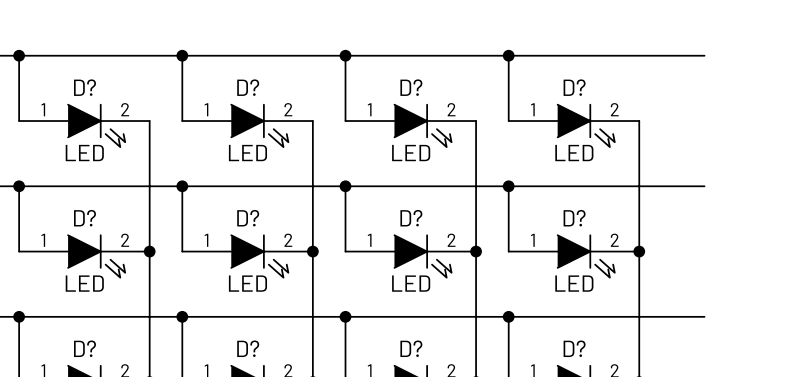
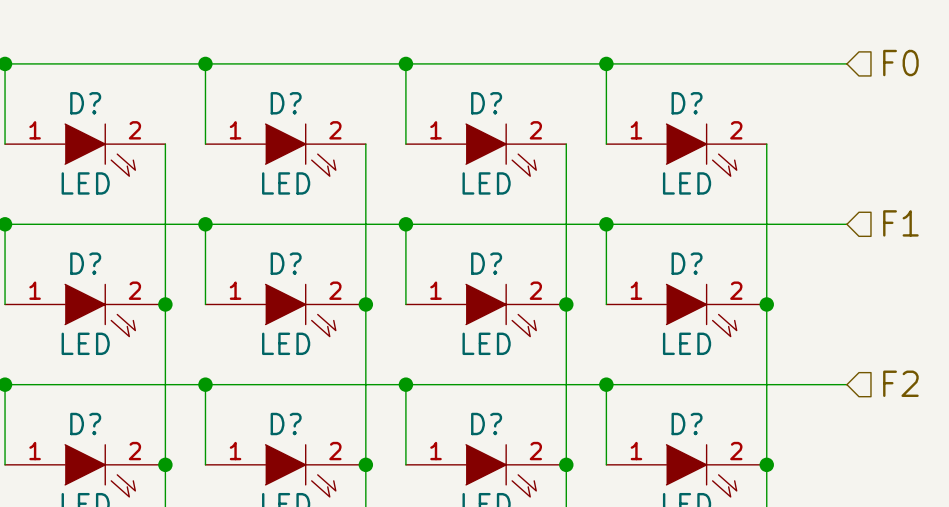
hierarchical label: none -> F0 (900, 63)
hierarchical label: none -> F1 (900, 223)
hierarchical label: none -> F2 (900, 383)

